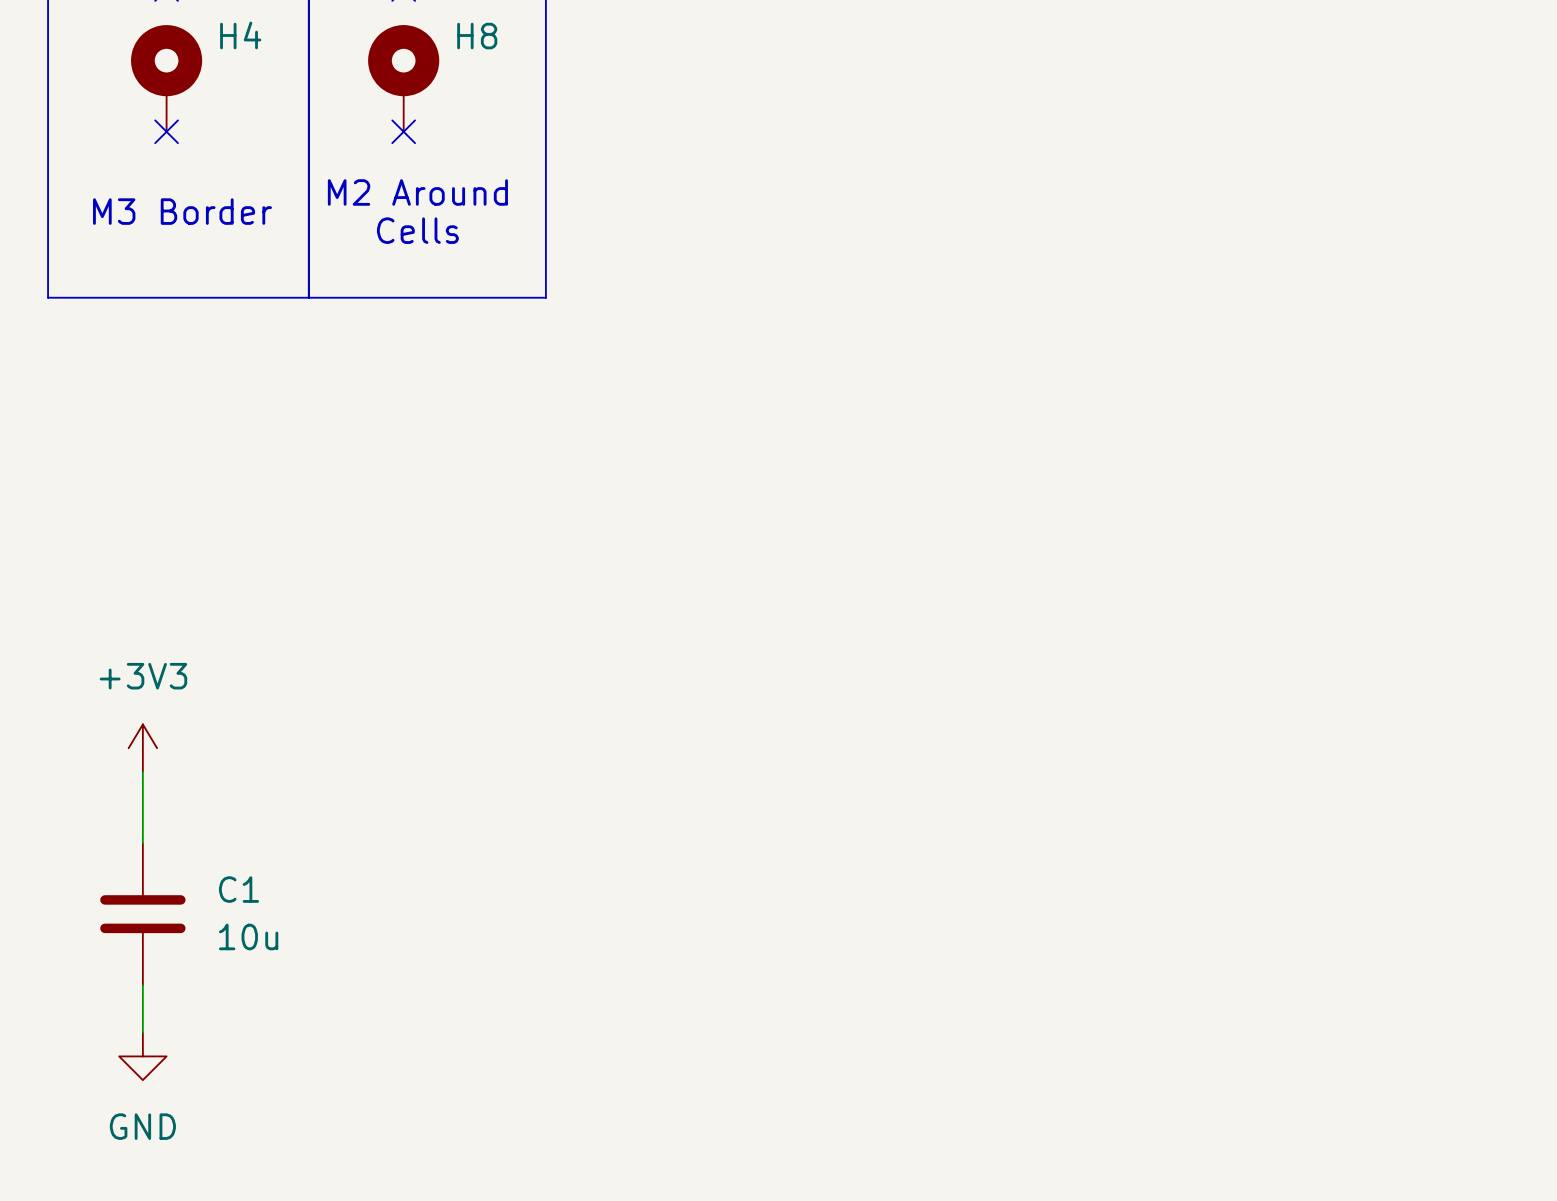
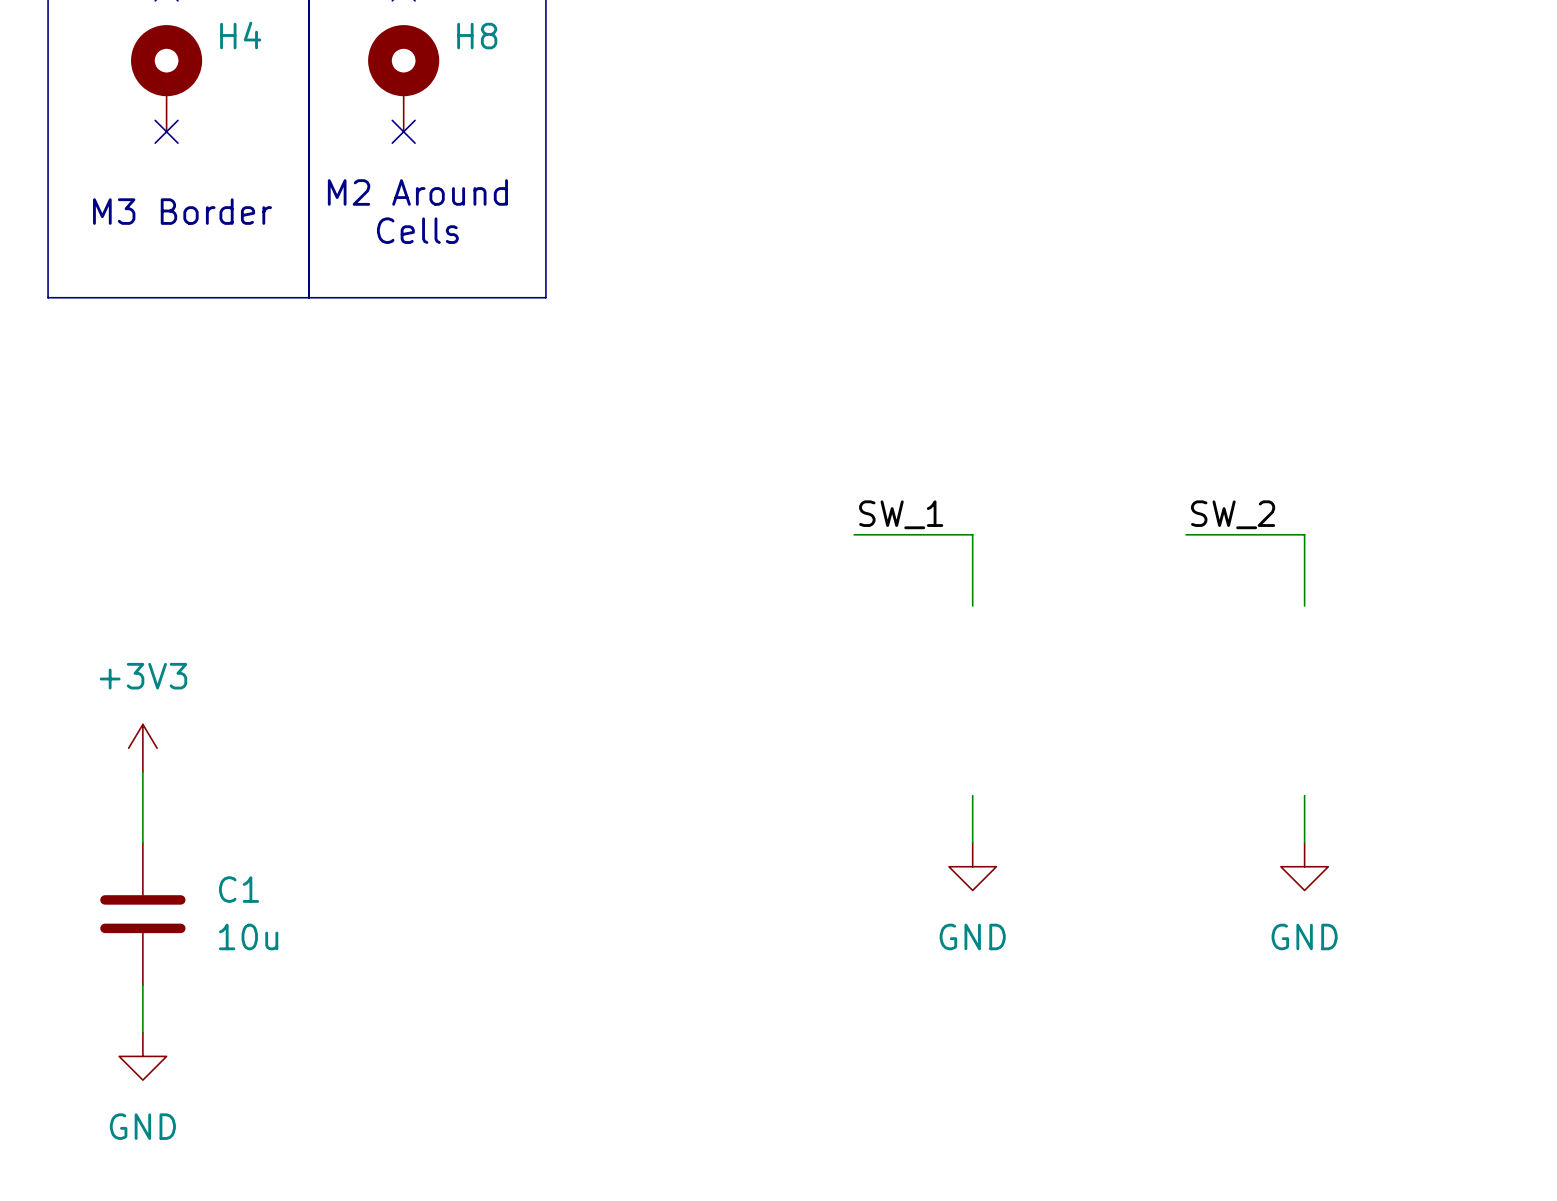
label: none -> SW_1 (901, 514)
label: none -> SW_2 (1233, 514)
wire: none -> (854, 534) (972, 534) (972, 605)
wire: none -> (1186, 534) (1304, 534) (1304, 605)
wire: none -> (972, 795) (972, 843)
wire: none -> (1304, 795) (1304, 843)
power symbol: none -> GND (972, 866)
power symbol: none -> GND (1304, 866)

